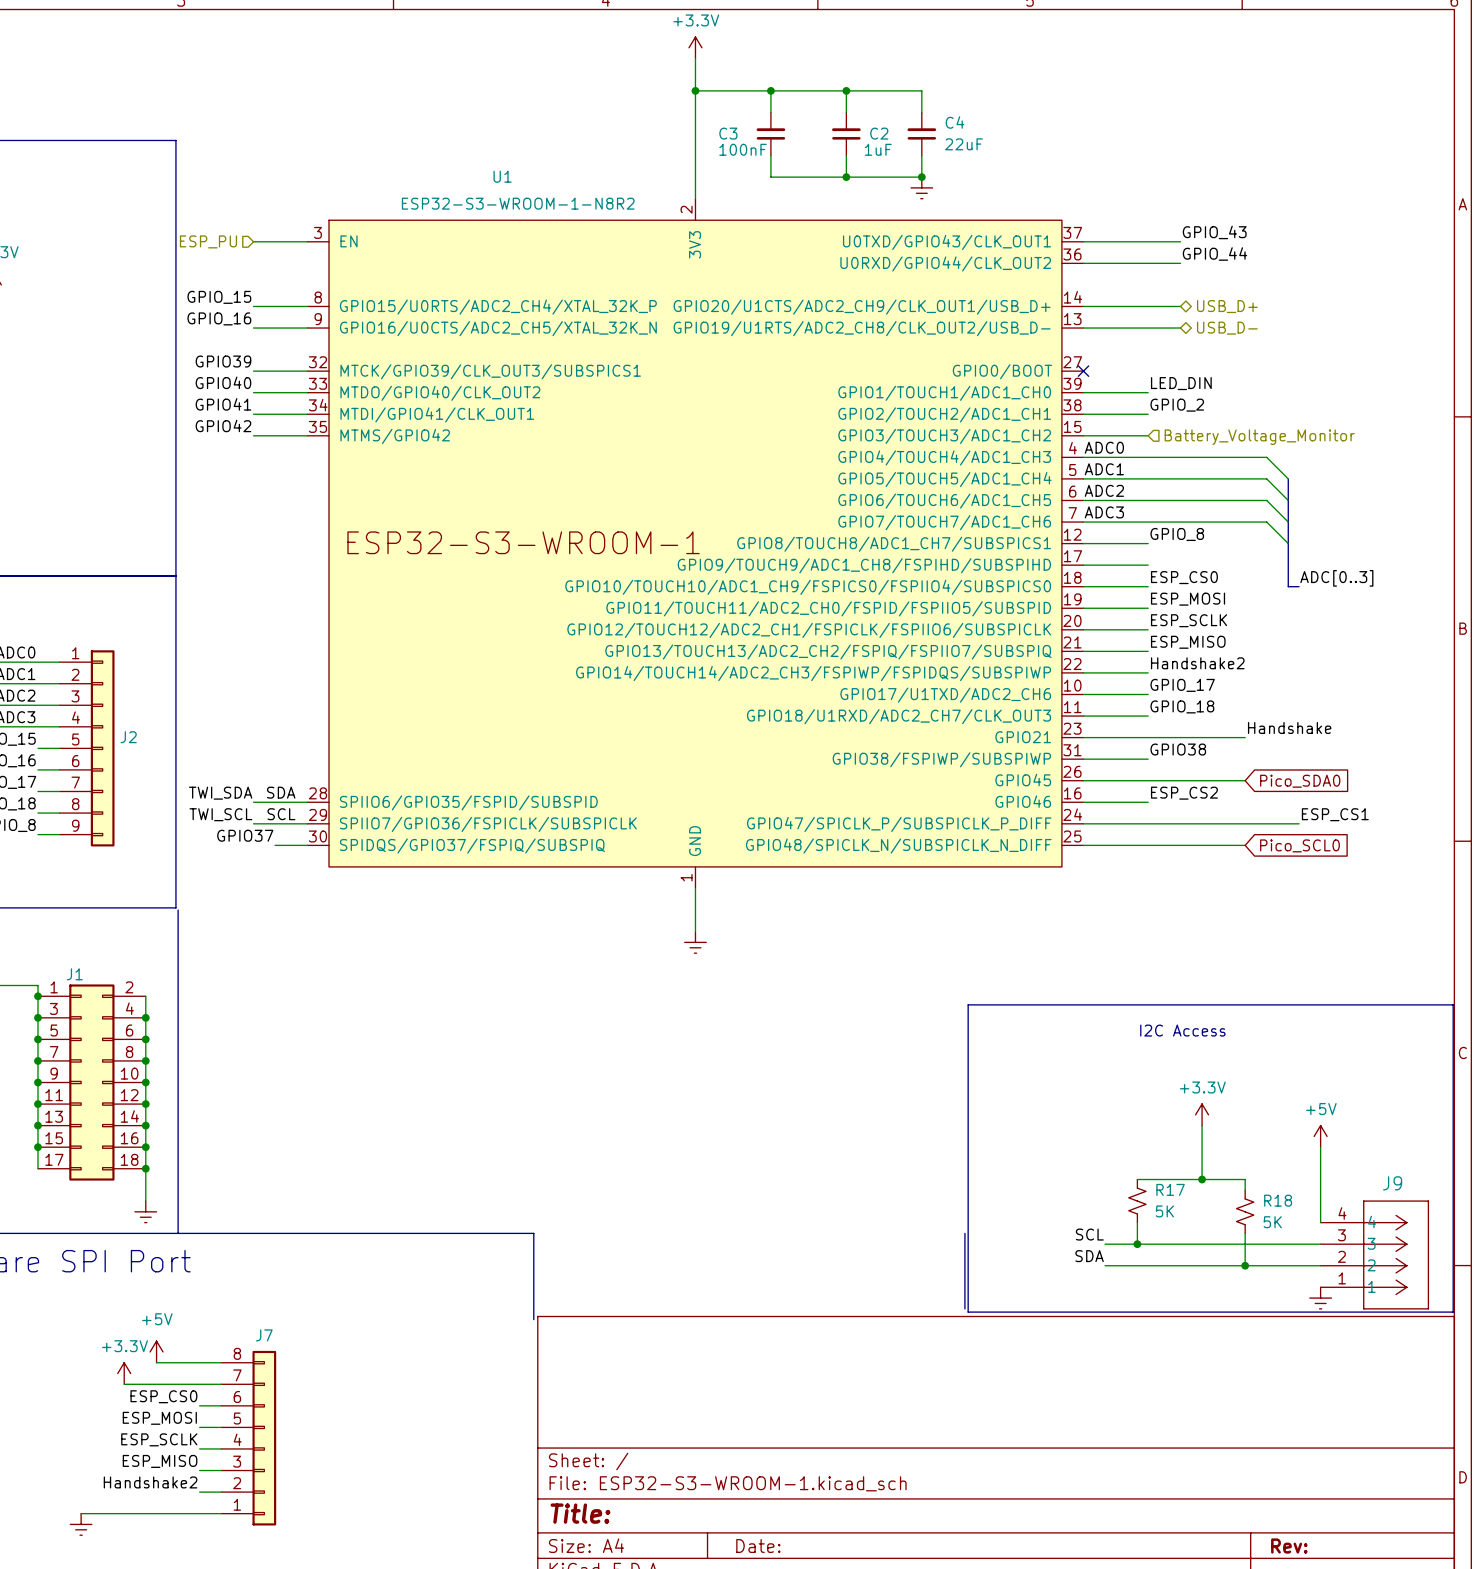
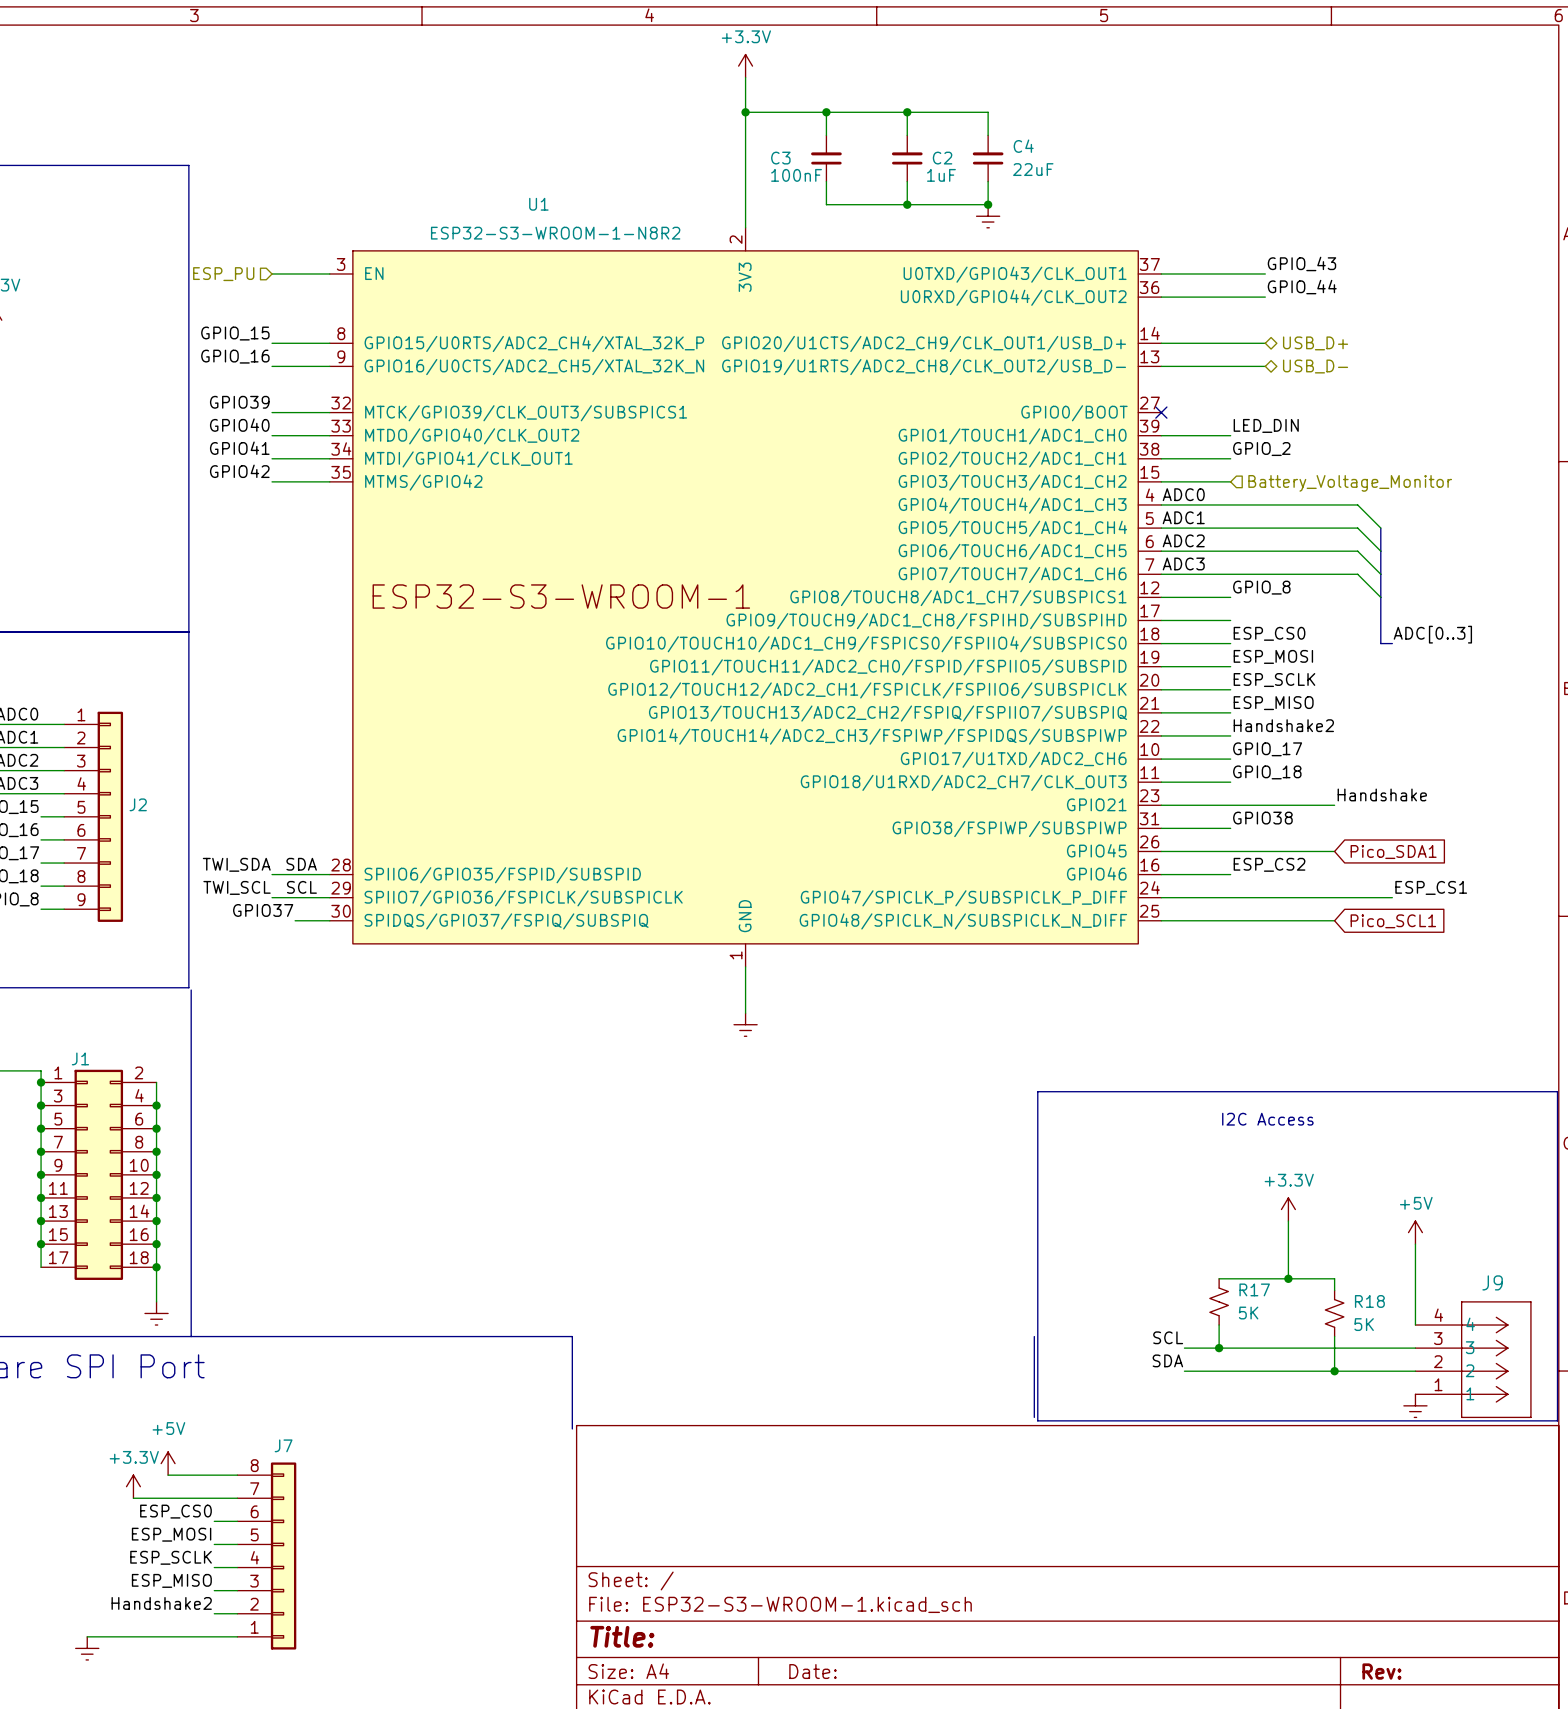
global label: Pico_SDA0 (1300, 781) -> Pico_SDA1 (1393, 852)
global label: Pico_SCL0 (1299, 845) -> Pico_SCL1 (1393, 921)

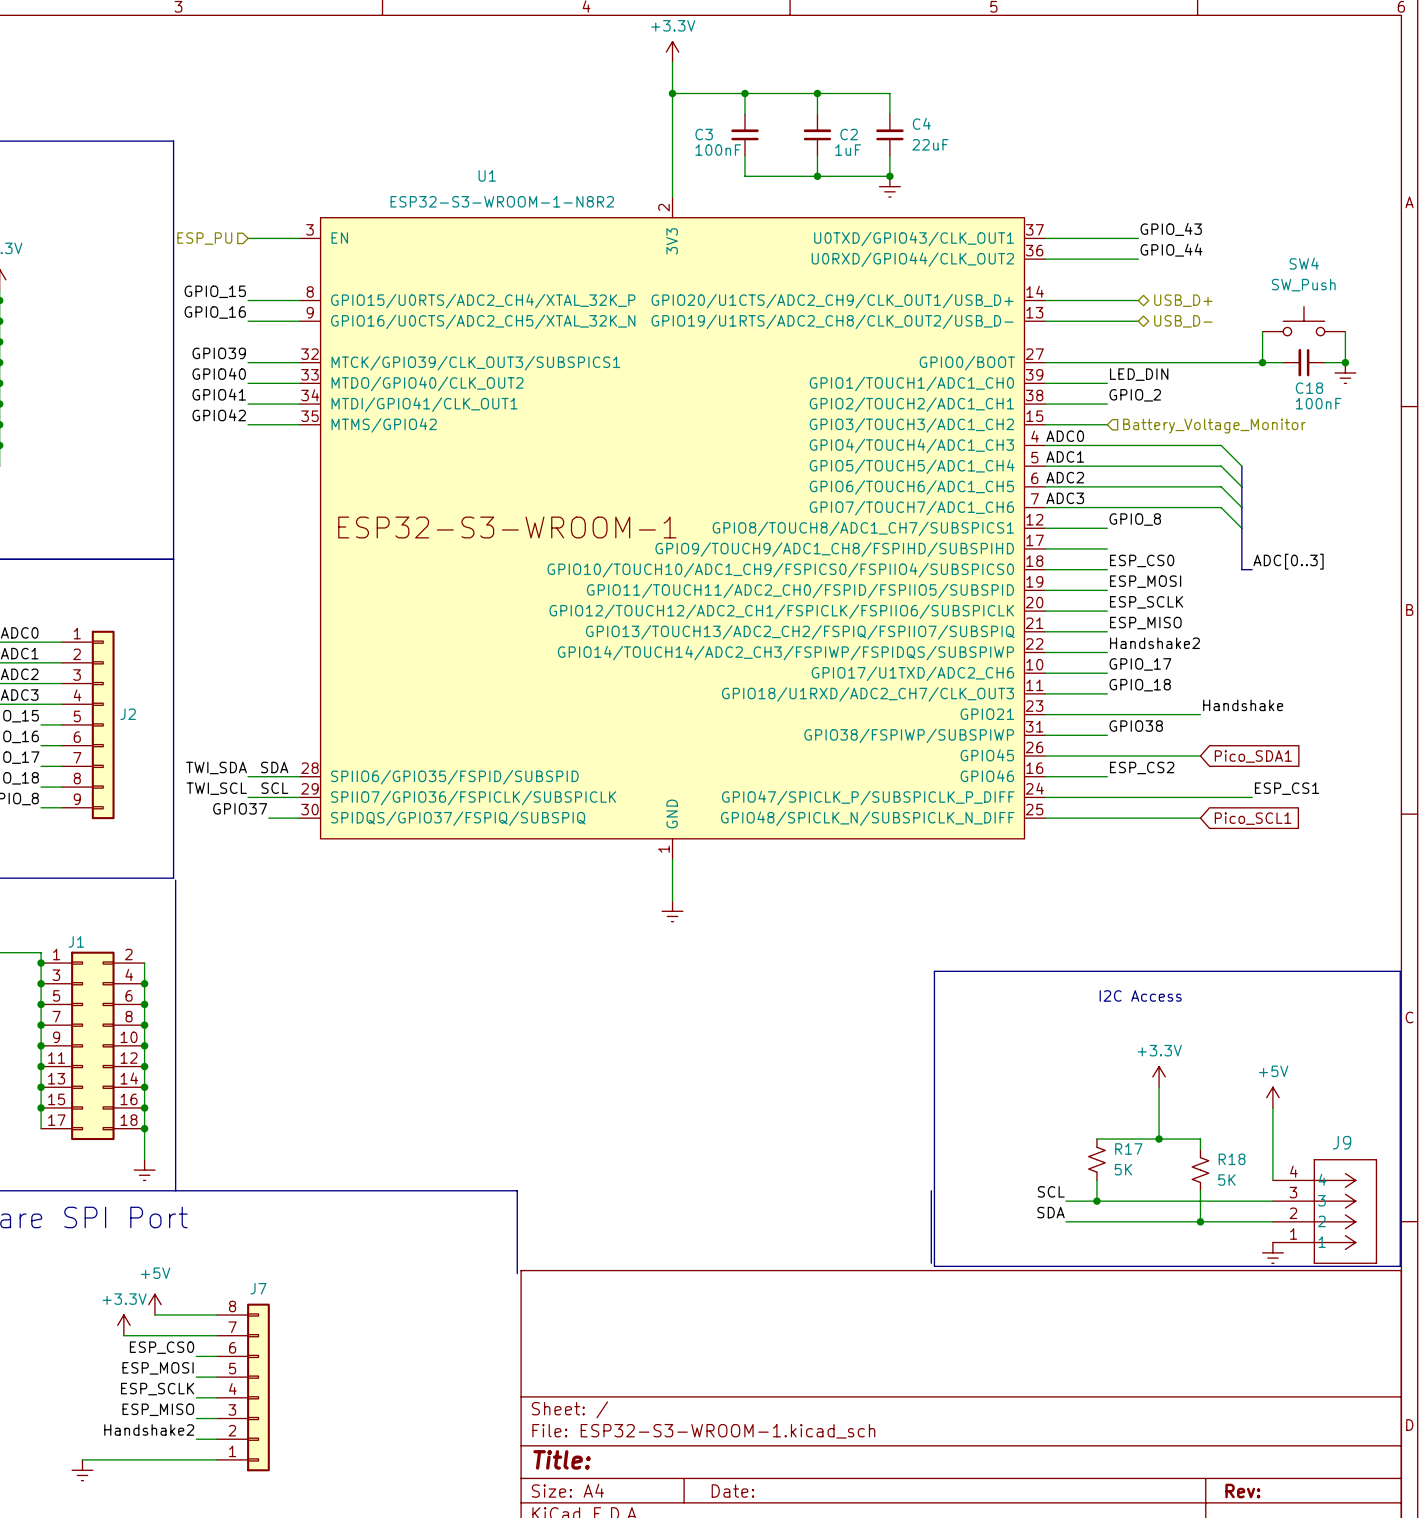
SW4: none -> SW_Push (1303, 321)
wire: none -> (1262, 331) (1262, 362)
wire: none -> (1345, 331) (1345, 362) (1324, 362)
wire: none -> (1045, 362) (1283, 362)
no-connect mark: (1161, 412) -> none
junction: none -> (1262, 362)
C18: none -> 100nF (1303, 362)
junction: none -> (1345, 362)
power symbol: none -> (1345, 372)

